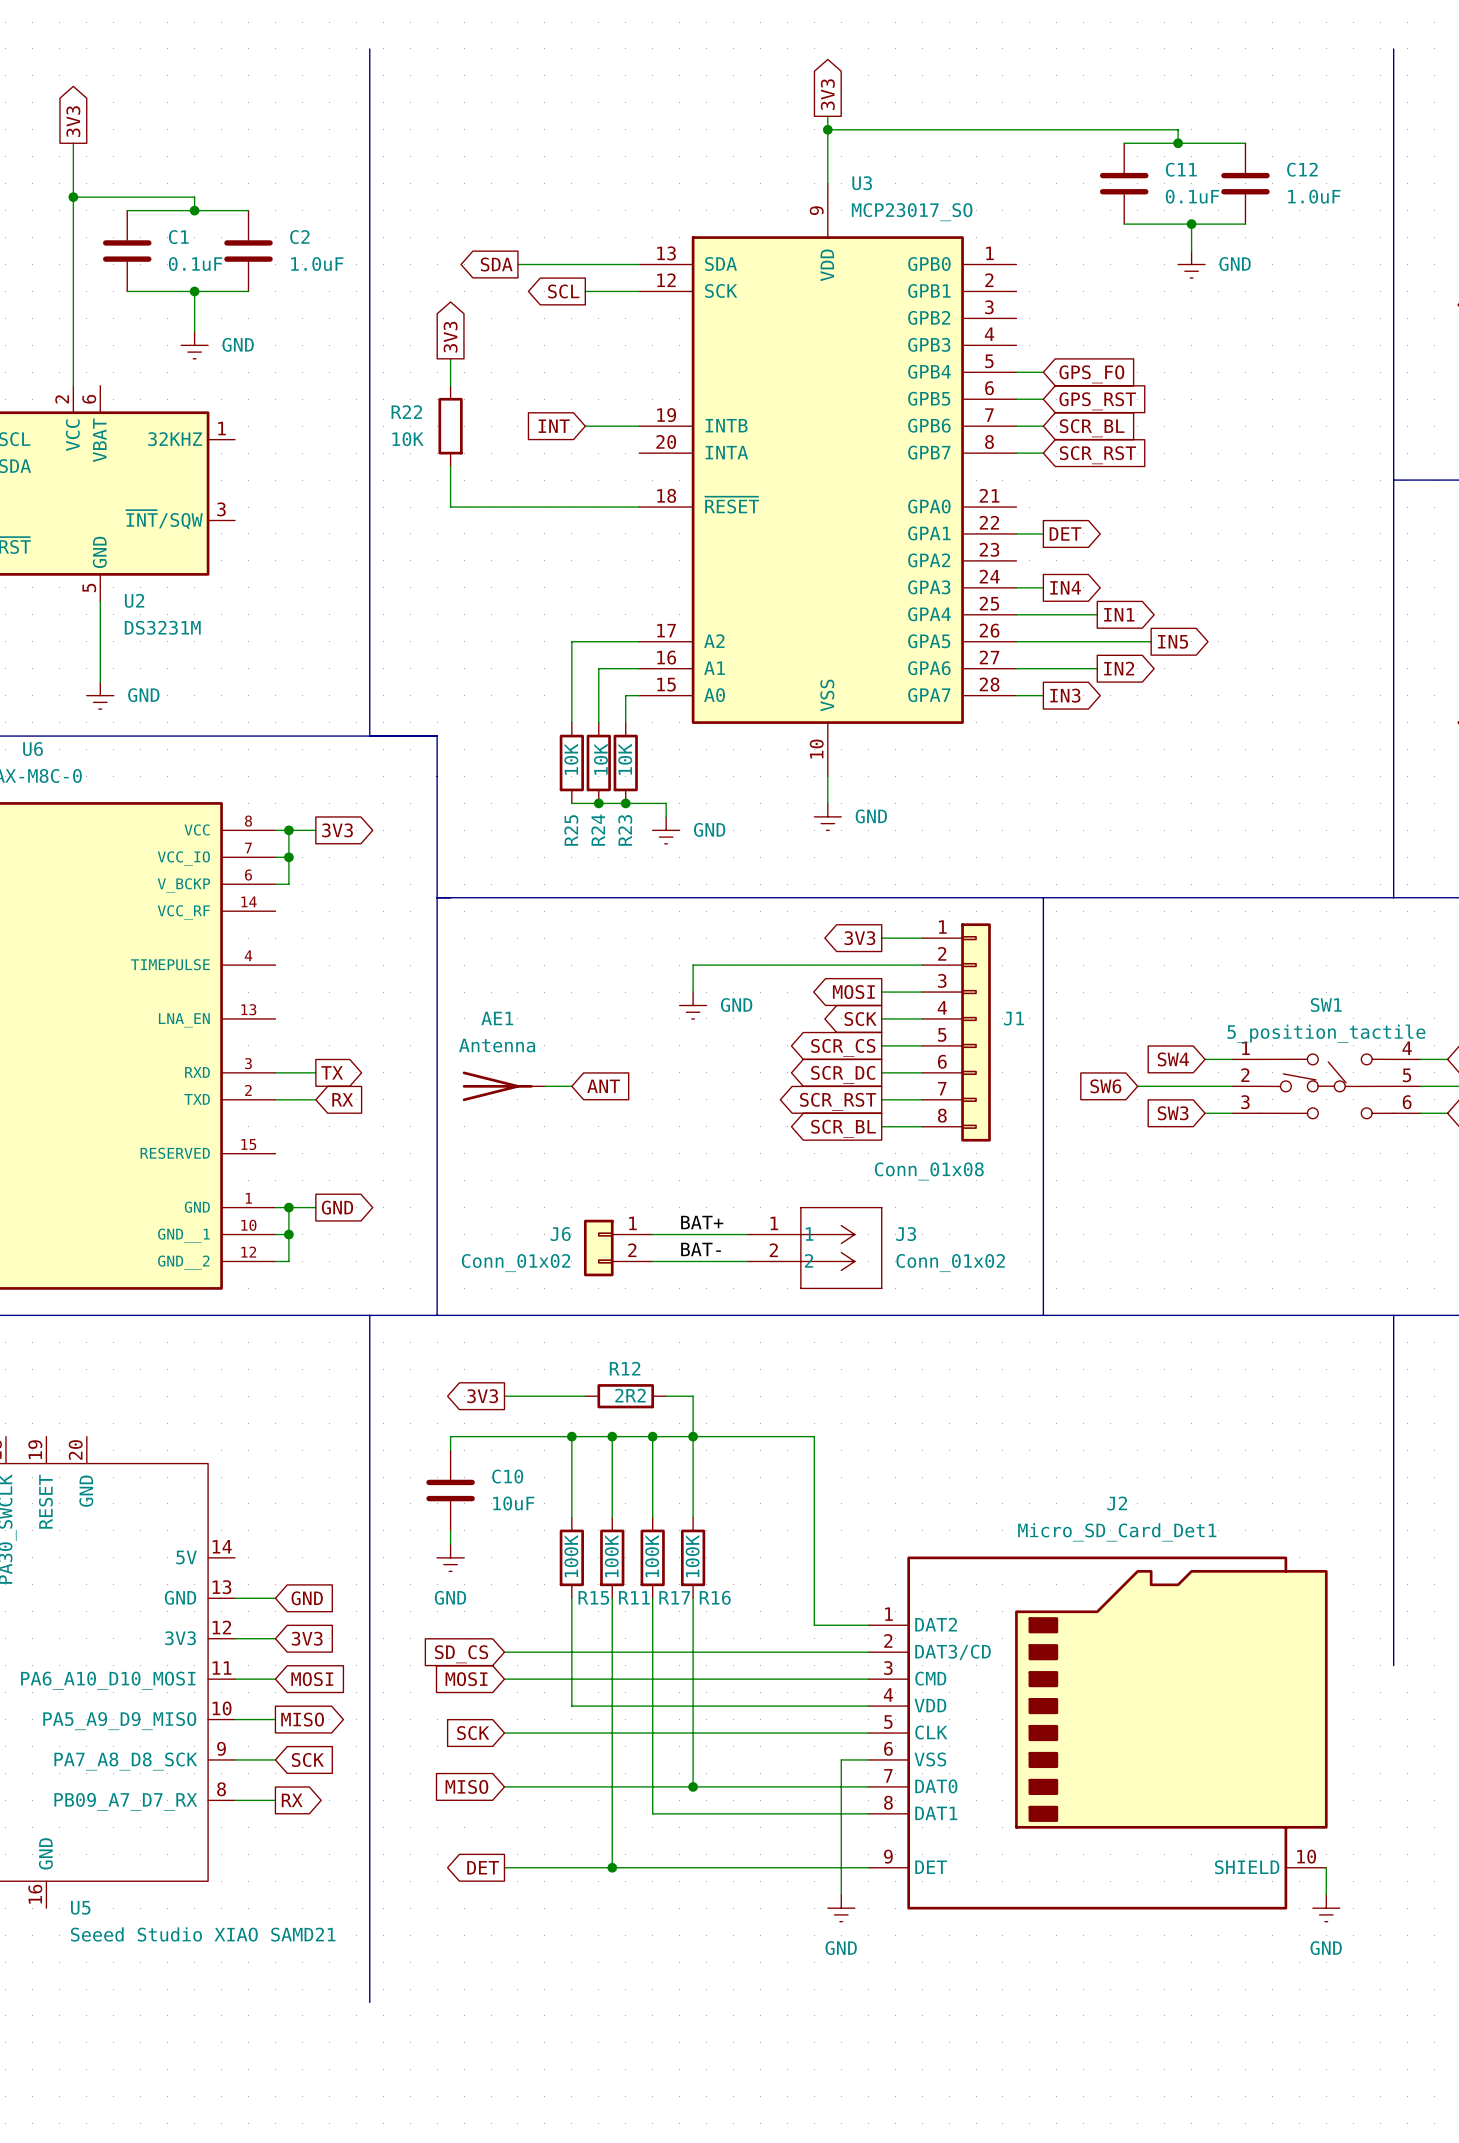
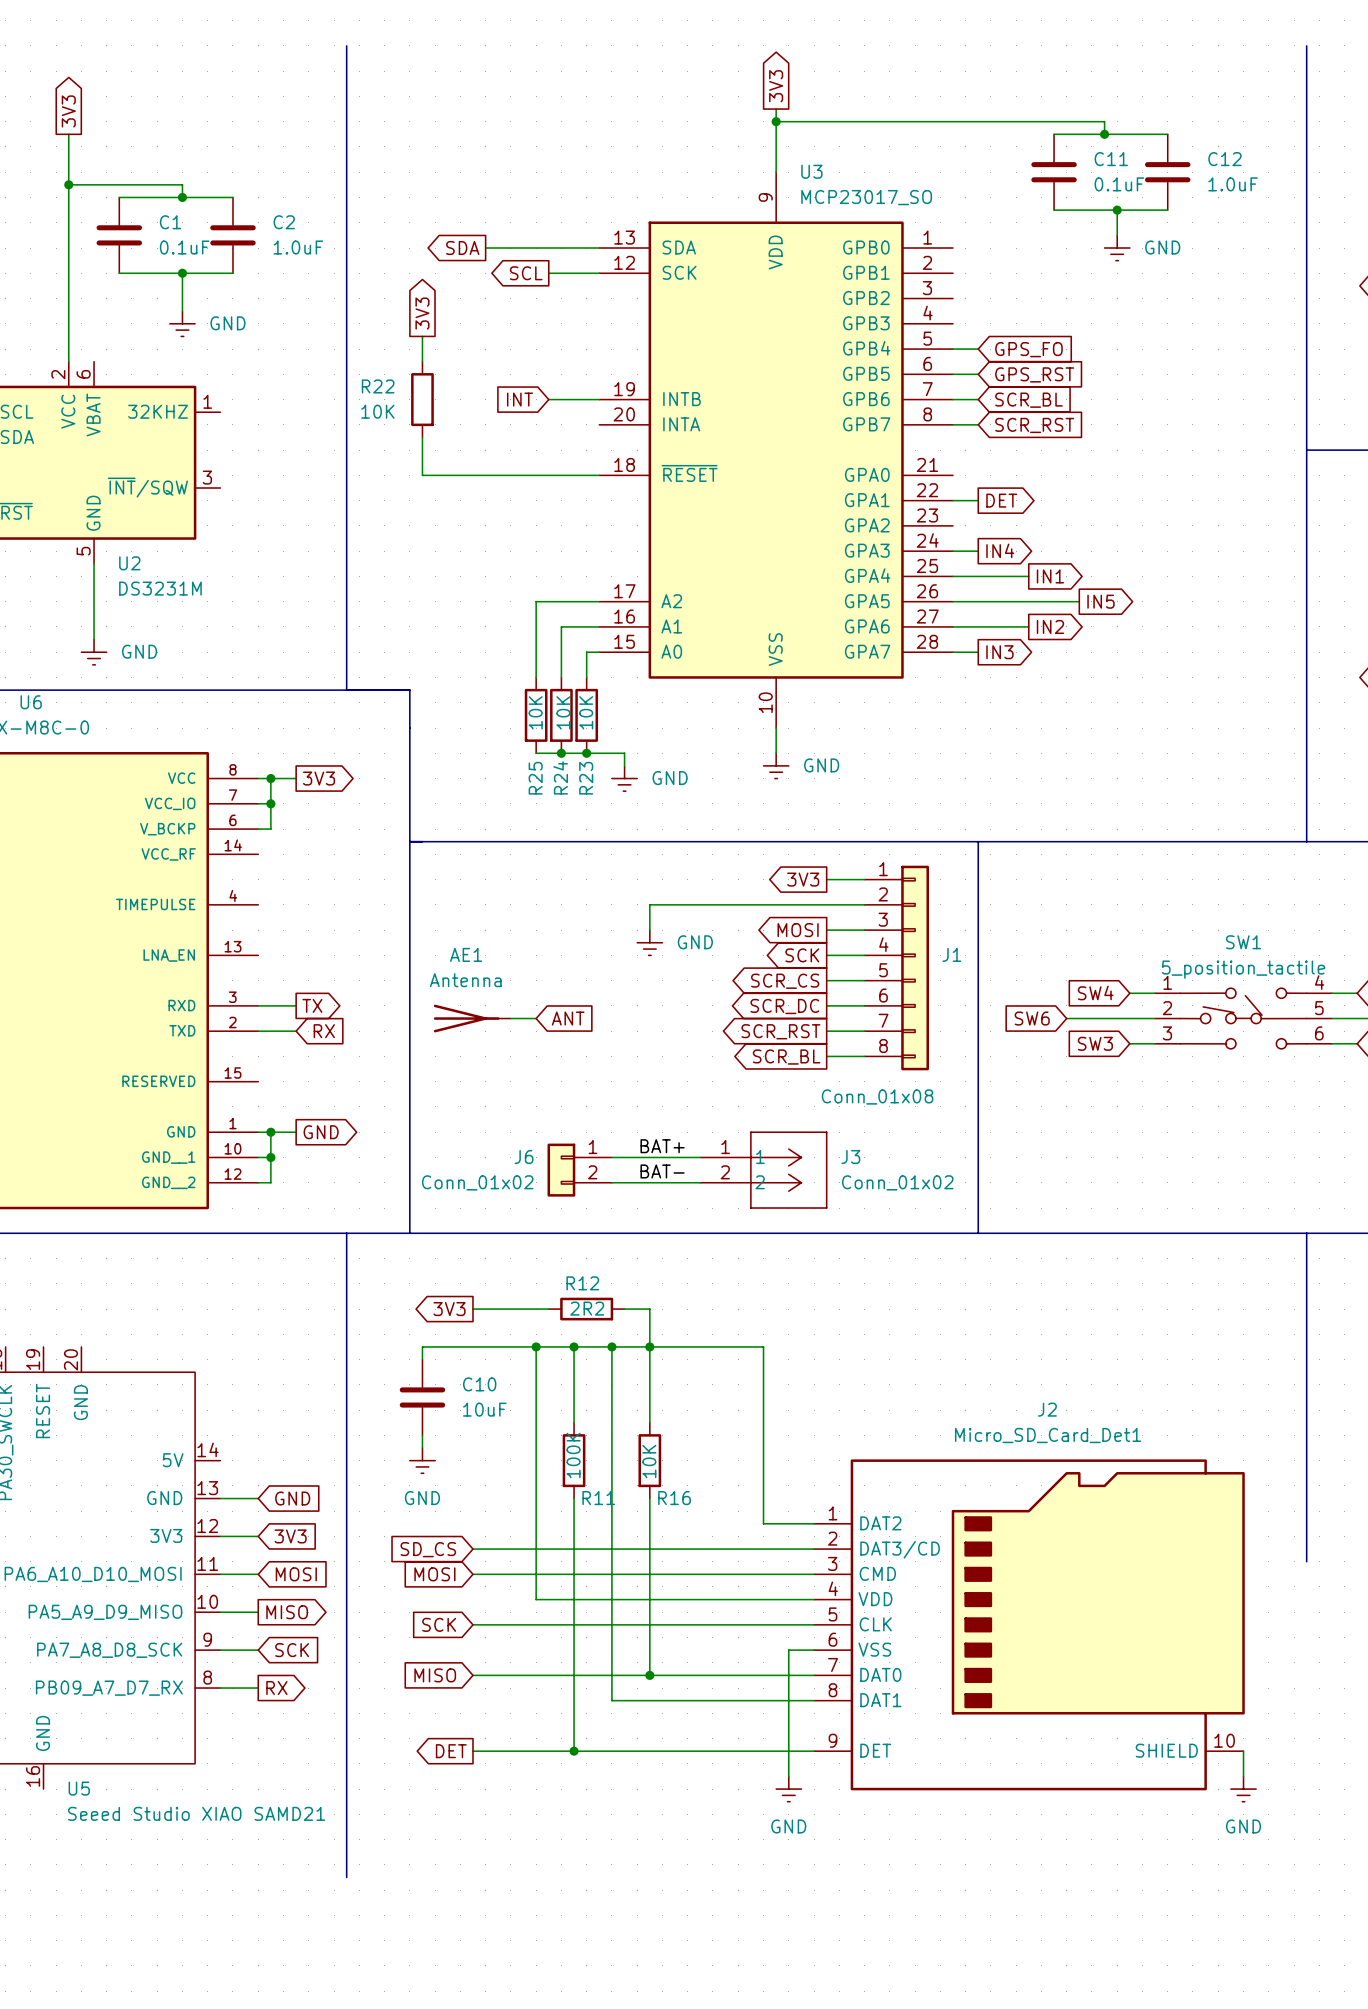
wire: none -> (536, 1422) (536, 1498)
wire: none -> (611, 1422) (611, 1498)
R16 value: 100K (692, 1556) -> 10K (649, 1461)
R15: 100K (571, 1557) -> none
R17: 100K (652, 1557) -> none

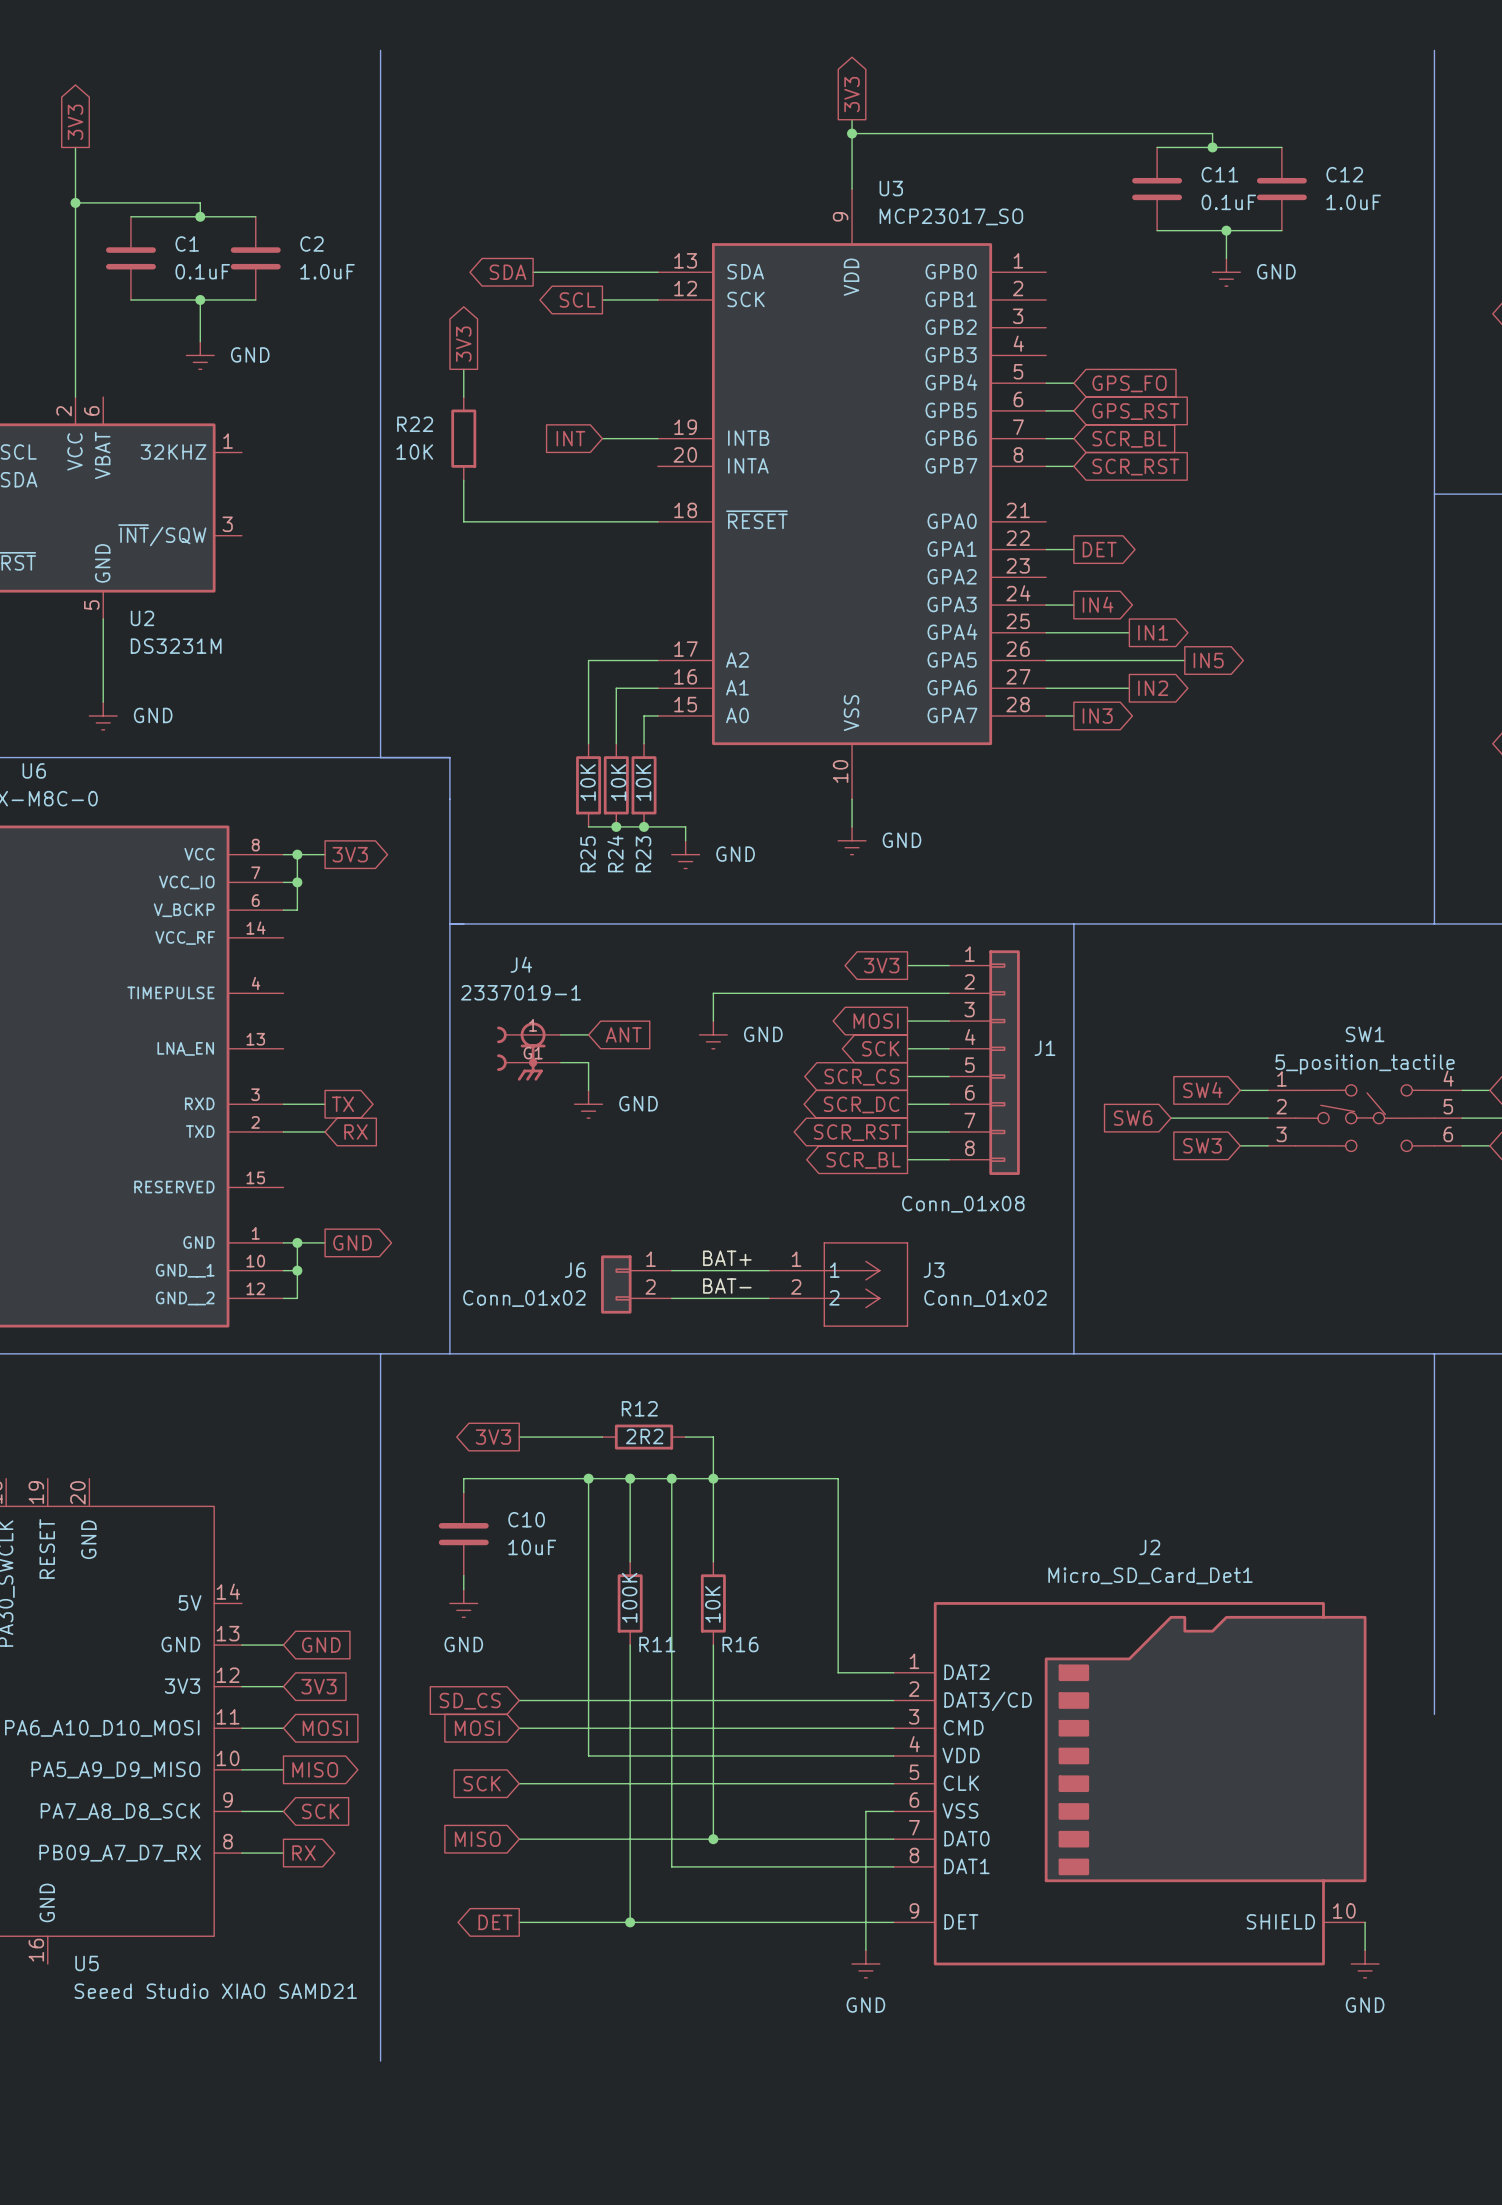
J4: none -> 2337019-1 (528, 1051)
wire: none -> (560, 1062) (588, 1062) (588, 1090)
power symbol: none -> GND (588, 1104)
AE1: Antenna (472, 1018) -> none
wire: (510, 1018) (536, 1018) -> (560, 1034) (588, 1034)
global label position: ANT (568, 1018) -> ANT (623, 1034)

